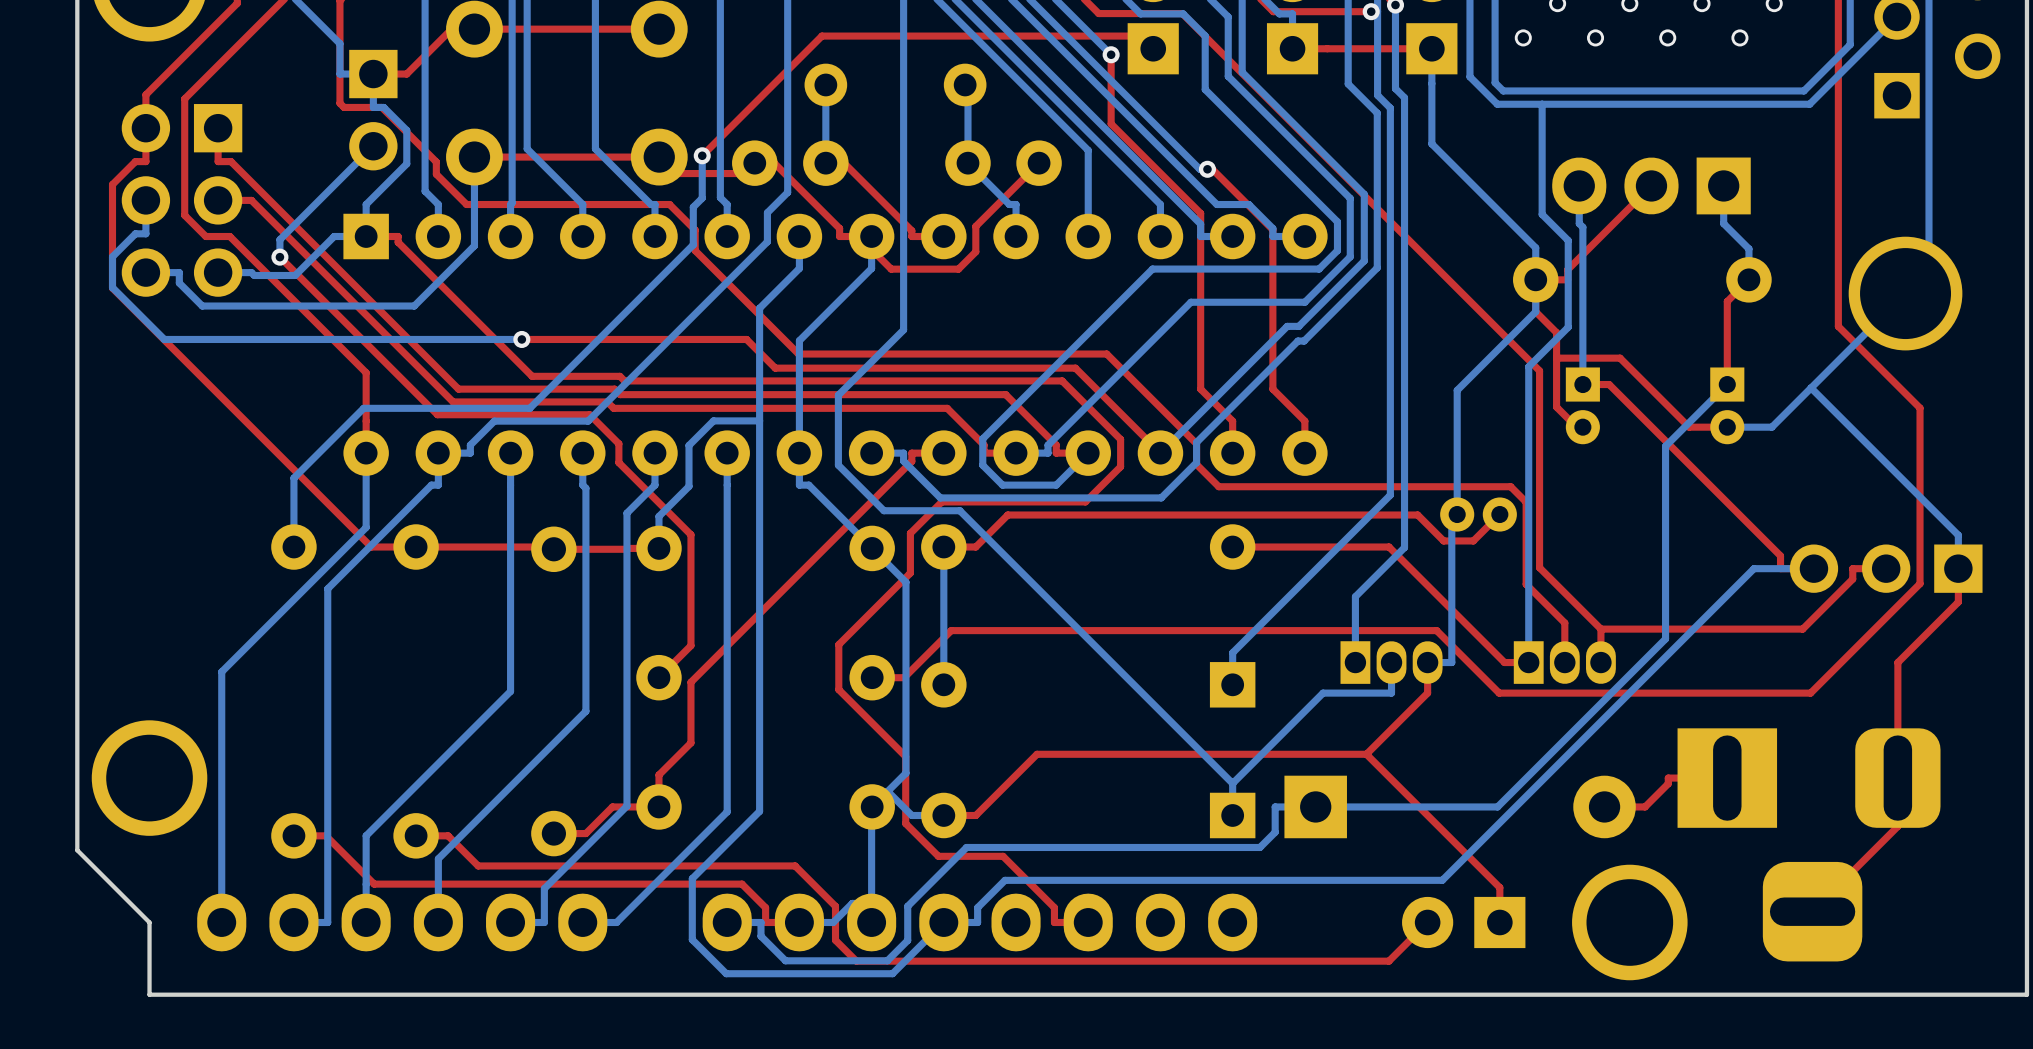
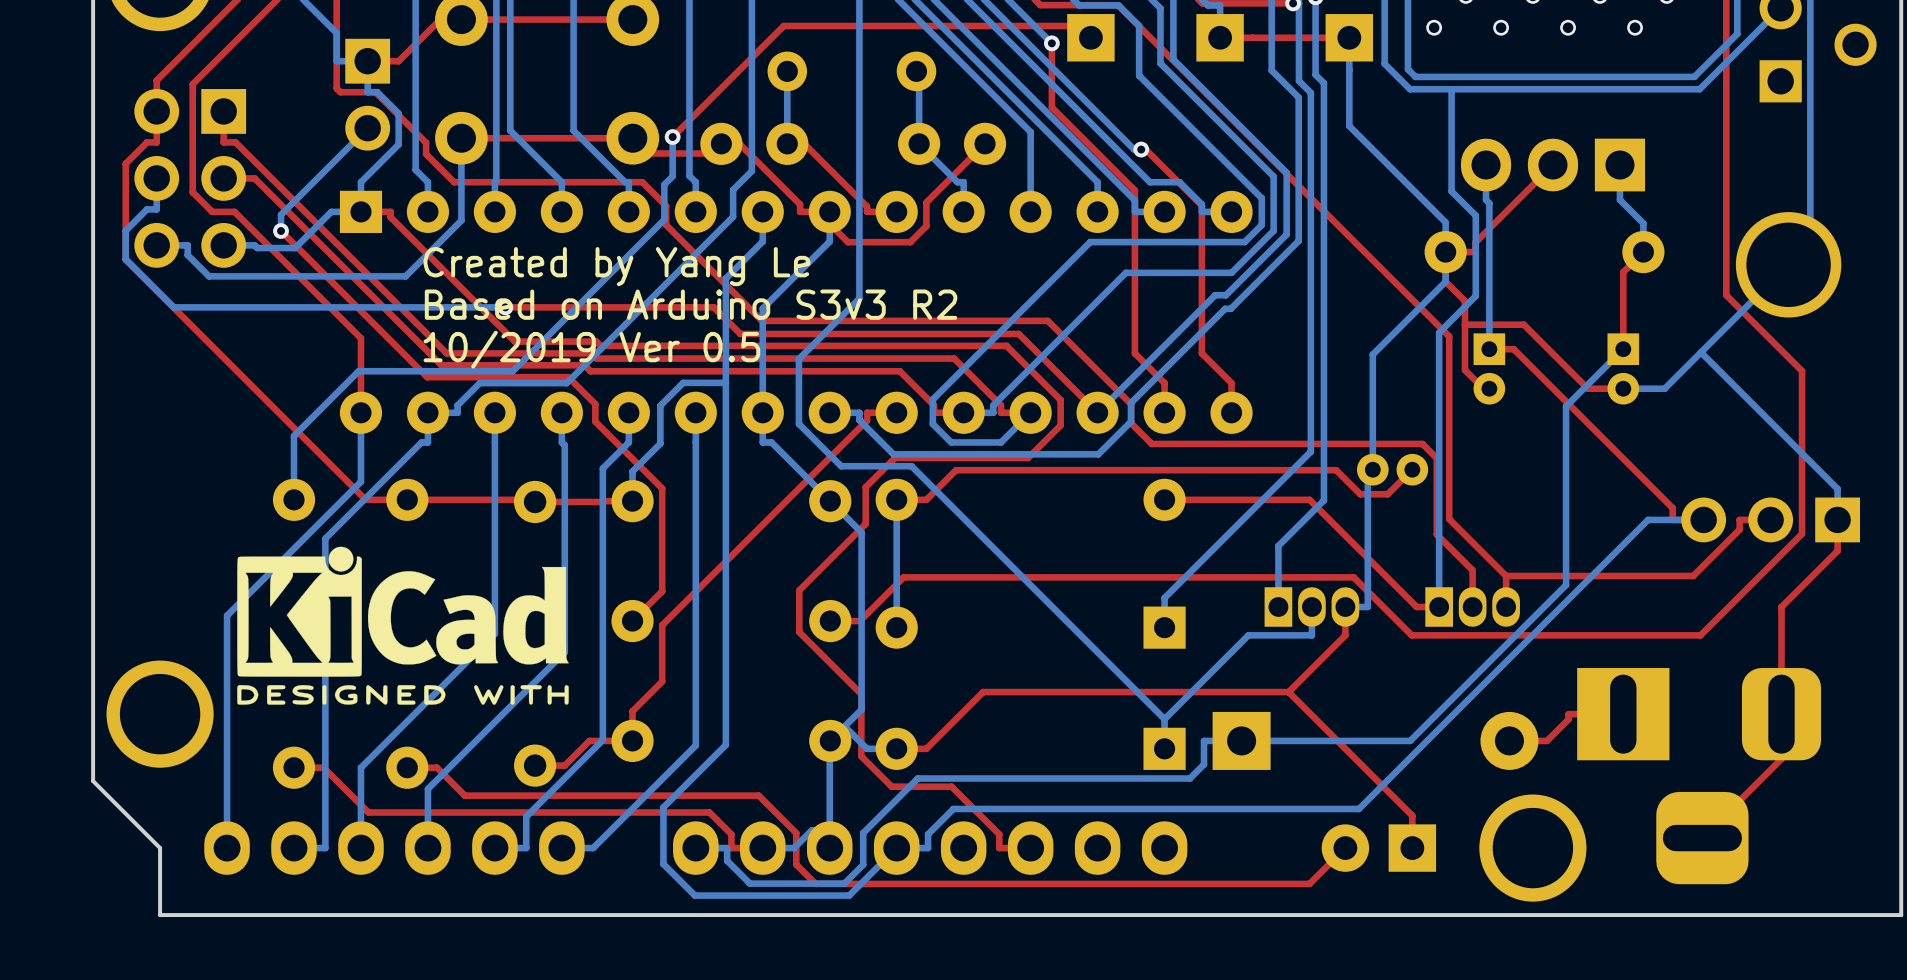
text: none -> Created by Yang Le (616, 266)
text: none -> Based on Arduino S3v3 R2 (691, 304)
text: none -> 10/2019 Ver 0.5 (591, 349)
drawing: none -> [237, 546, 569, 705]

